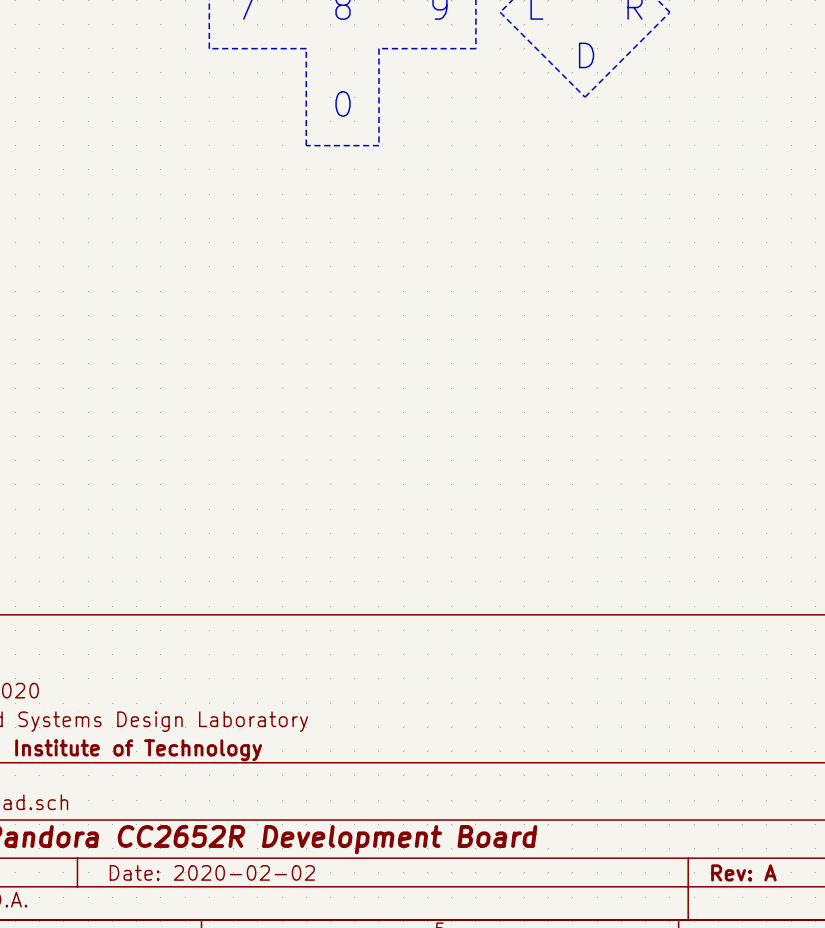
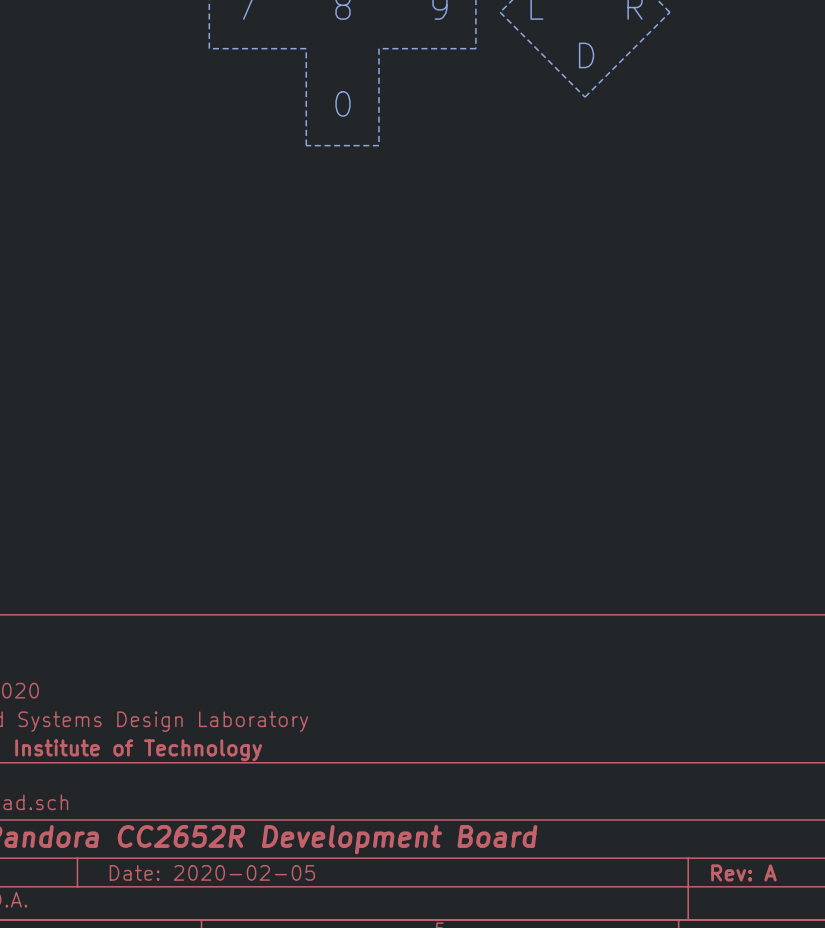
title block: Date: 2020-02-02 (212, 872) -> Date: 2020-02-05 (212, 872)

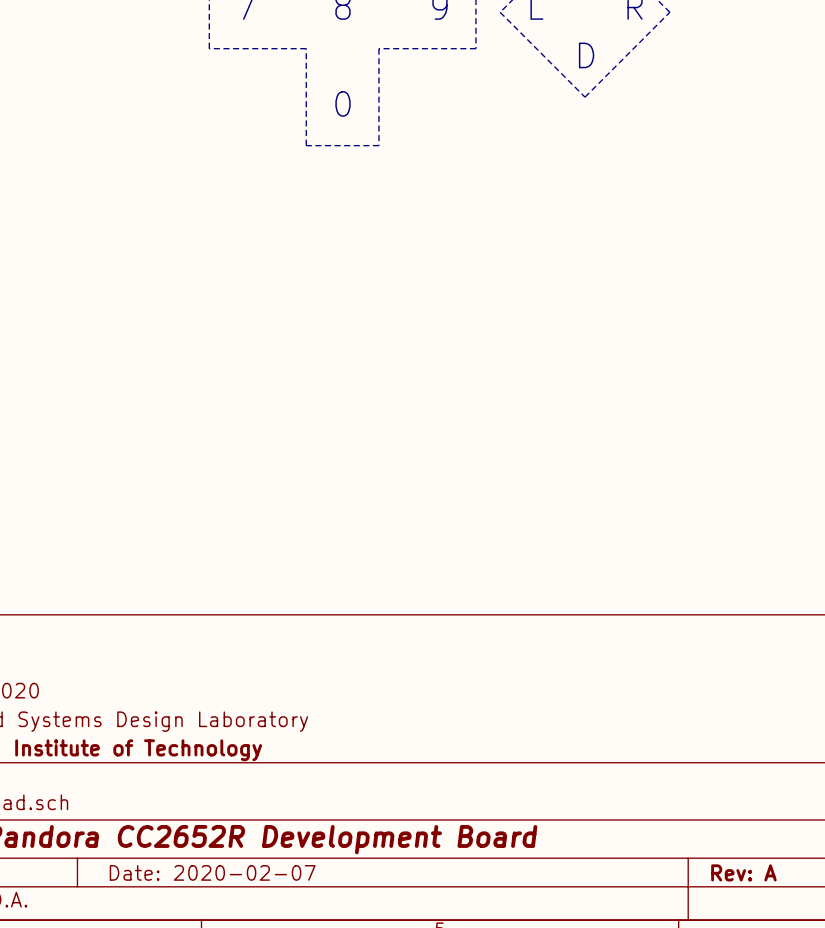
title block: Date: 2020-02-05 (212, 872) -> Date: 2020-02-07 (212, 872)

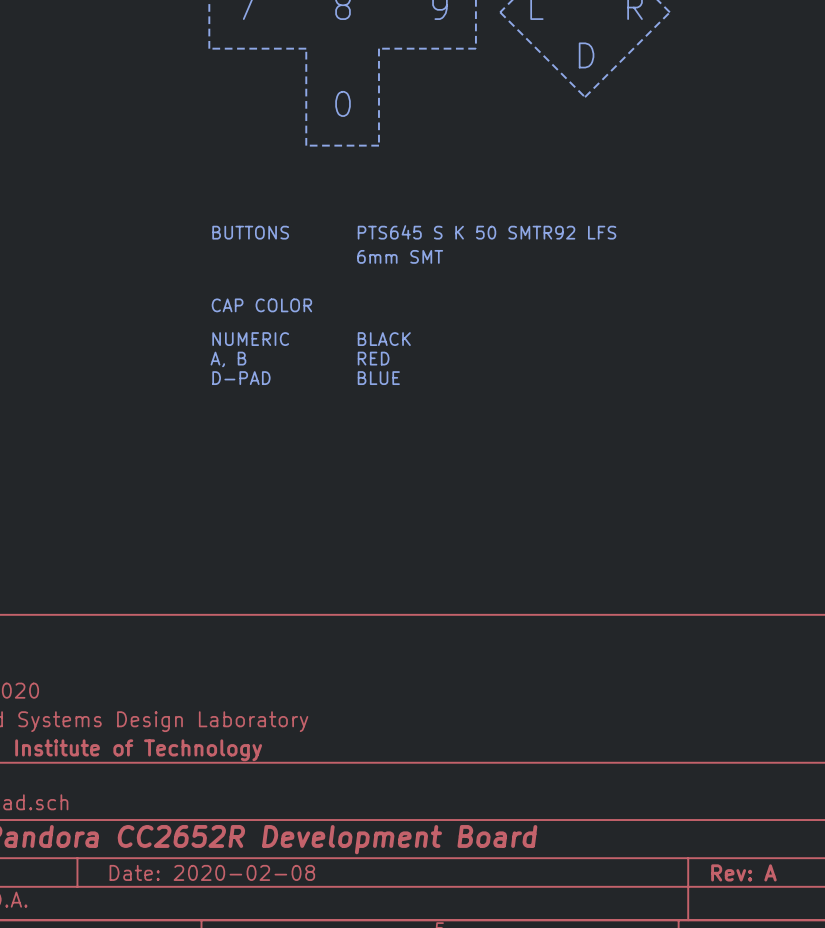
text: none -> BUTTONS (250, 232)
text: none -> PTS645 S K 50 SMTR92 LFS (487, 232)
text: none -> 6mm SMT (400, 256)
text: none -> CAP COLOR (261, 305)
text: none -> NUMERIC (250, 339)
text: none -> BLACK (384, 339)
text: none -> RED (373, 358)
text: none -> A, B (228, 359)
text: none -> D-PAD (241, 378)
text: none -> BLUE (378, 378)
title block: Date: 2020-02-07 (212, 872) -> Date: 2020-02-08 (212, 872)

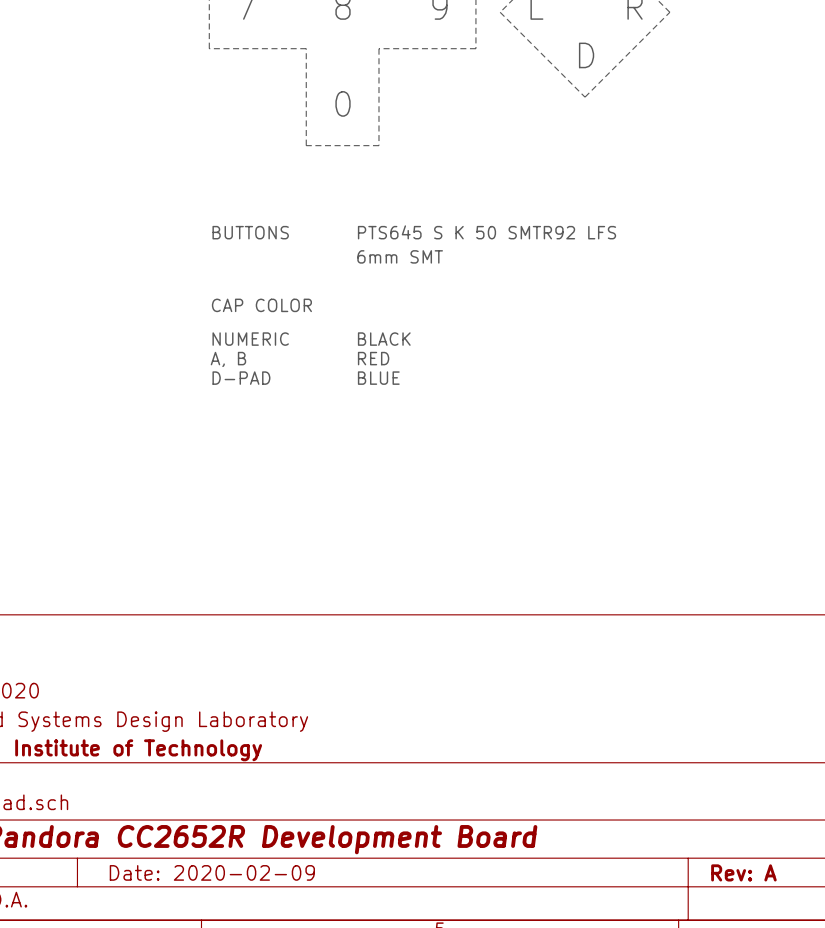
title block: Date: 2020-02-08 (212, 872) -> Date: 2020-02-09 (212, 872)

